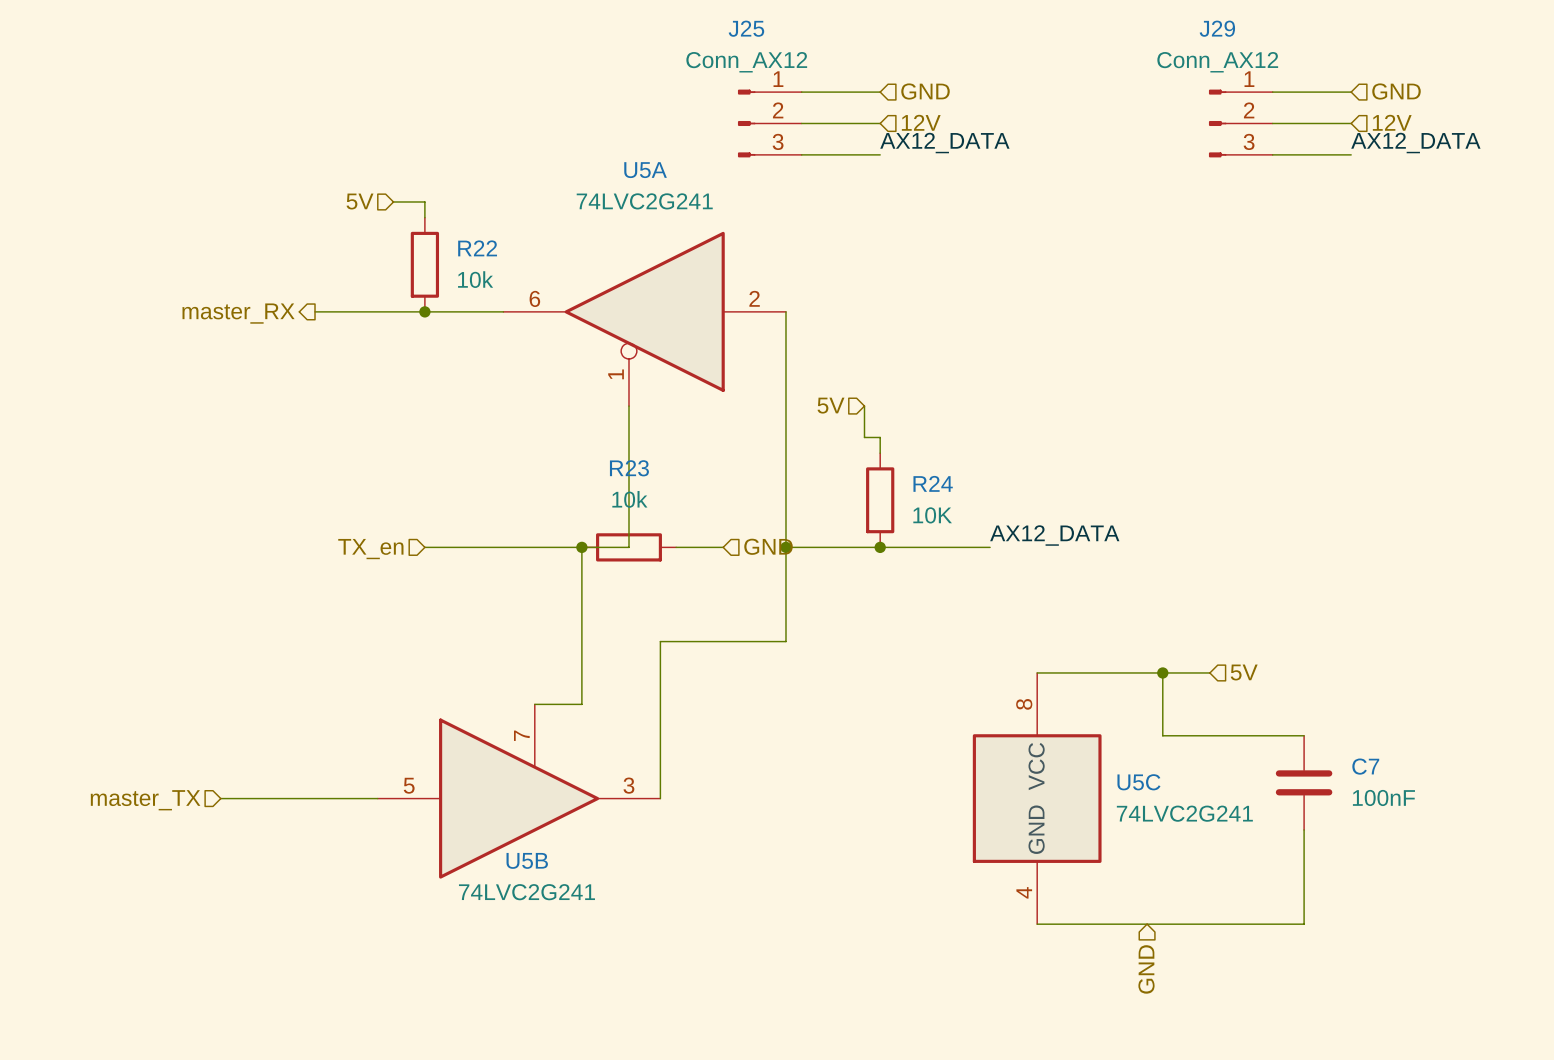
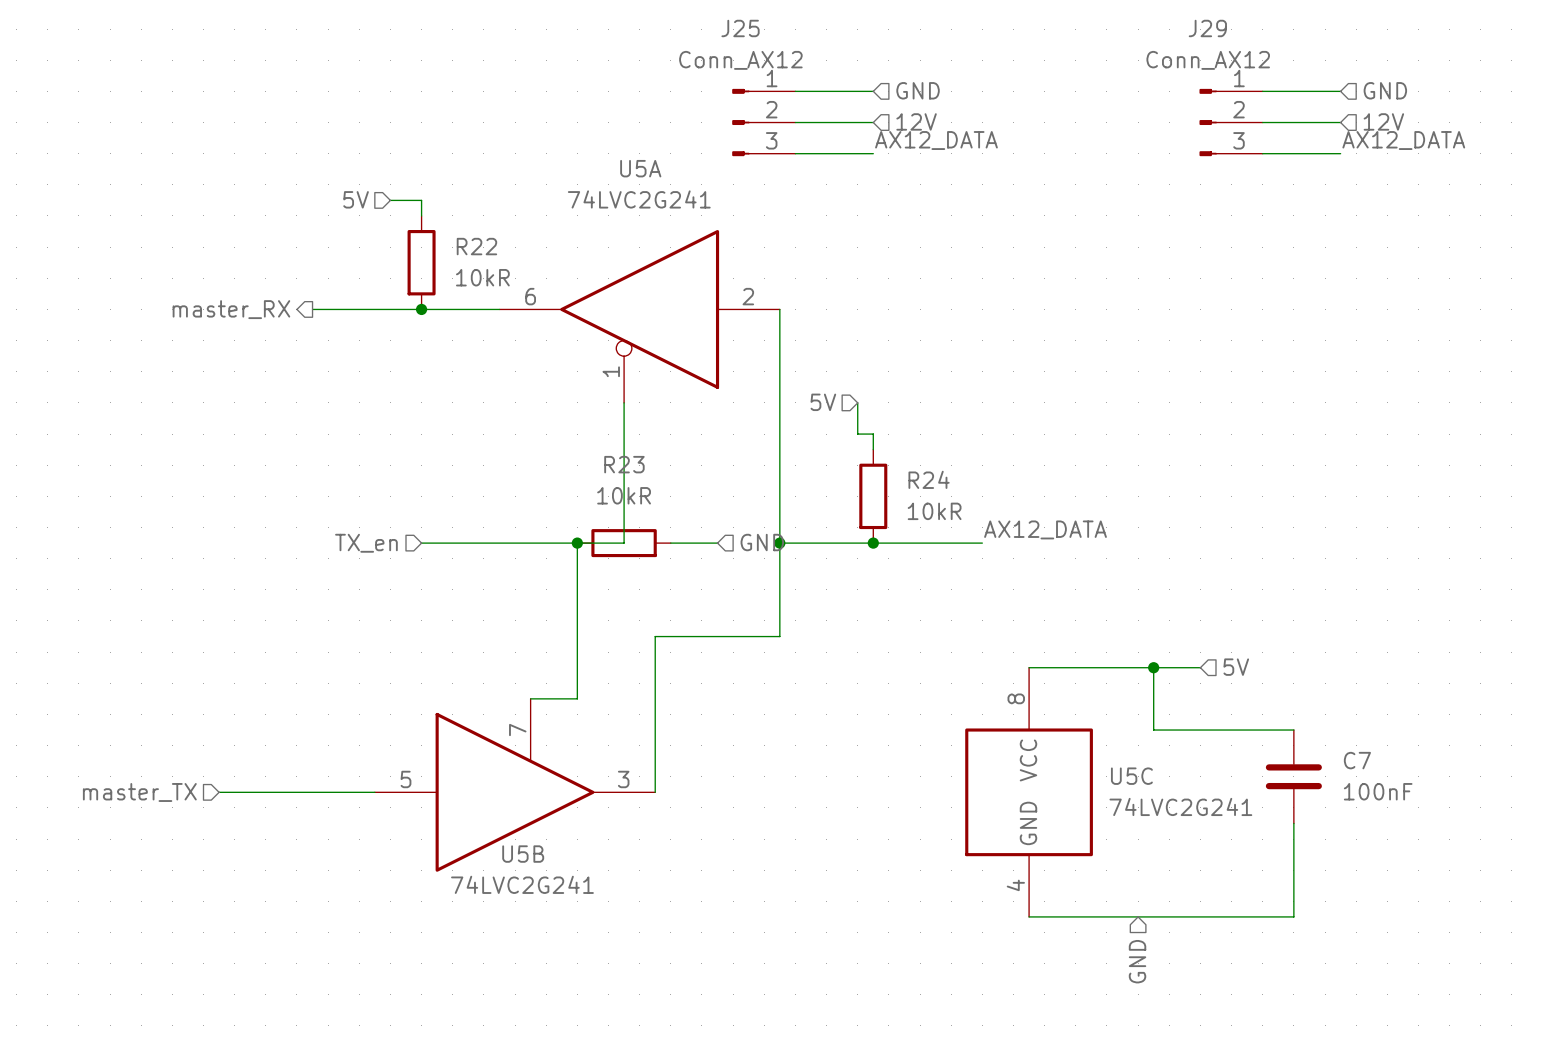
R22 value: 10k (475, 279) -> 10kR (482, 277)
R23 value: 10k (629, 499) -> 10kR (624, 495)
R24 value: 10K (932, 515) -> 10kR (934, 511)

